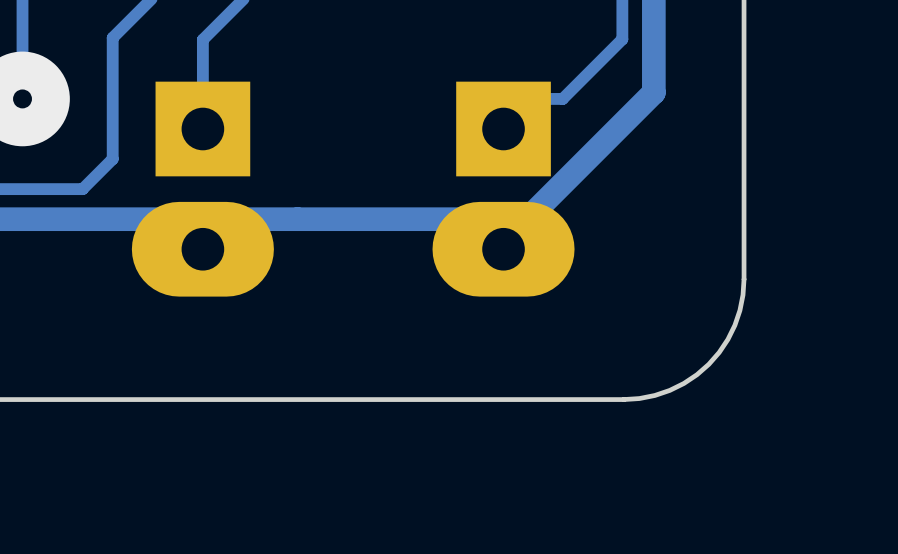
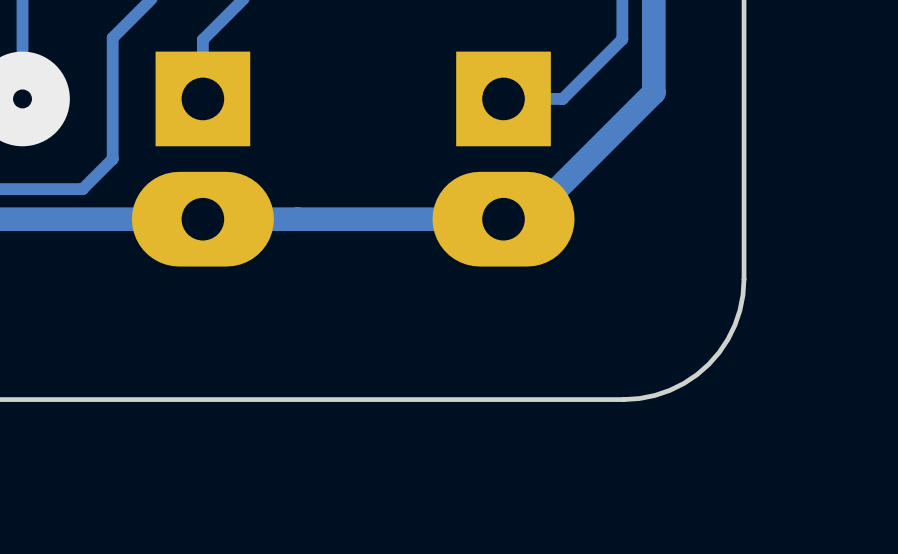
part position: (202, 189) -> (202, 159)
part position: (503, 189) -> (503, 159)

